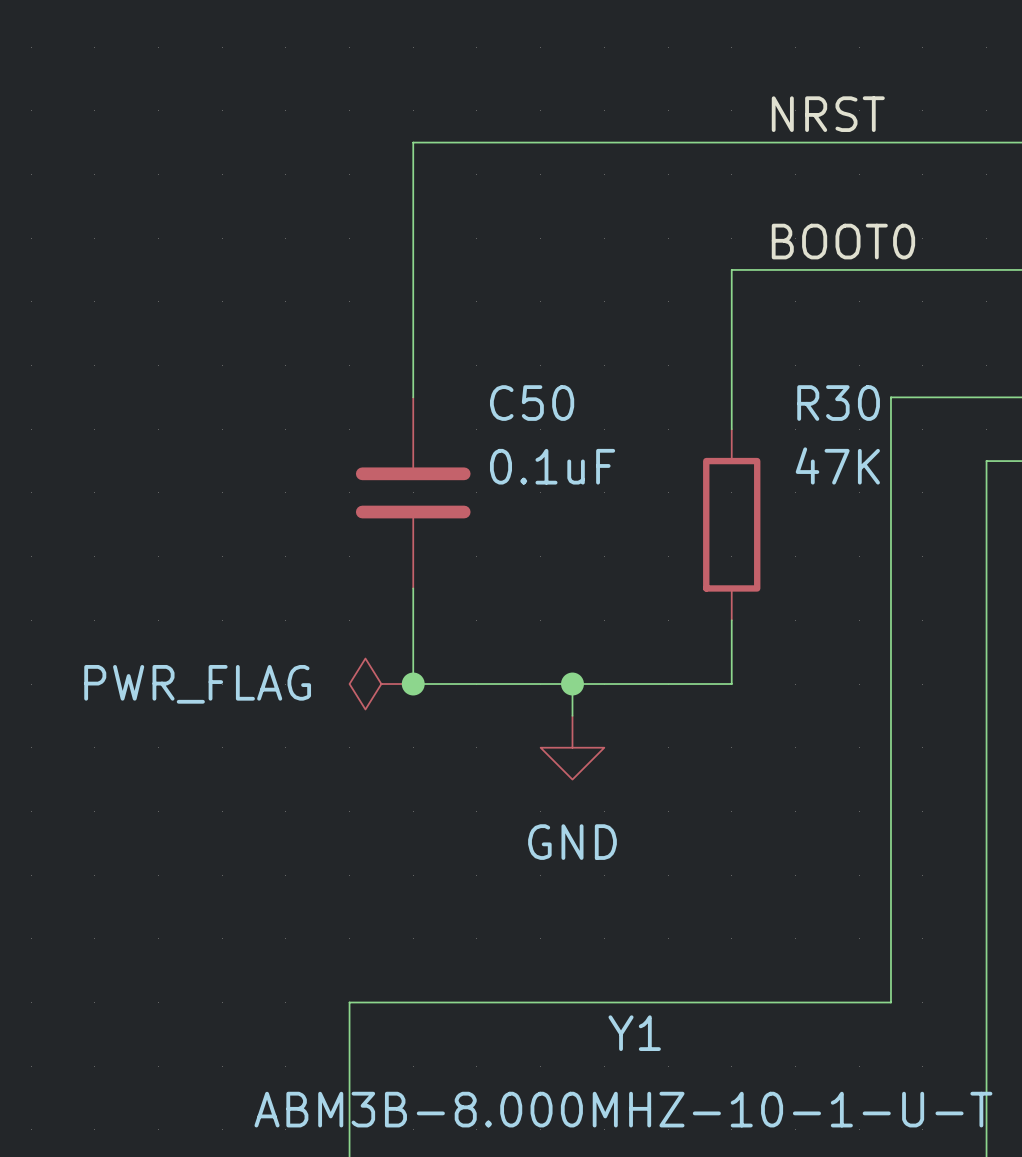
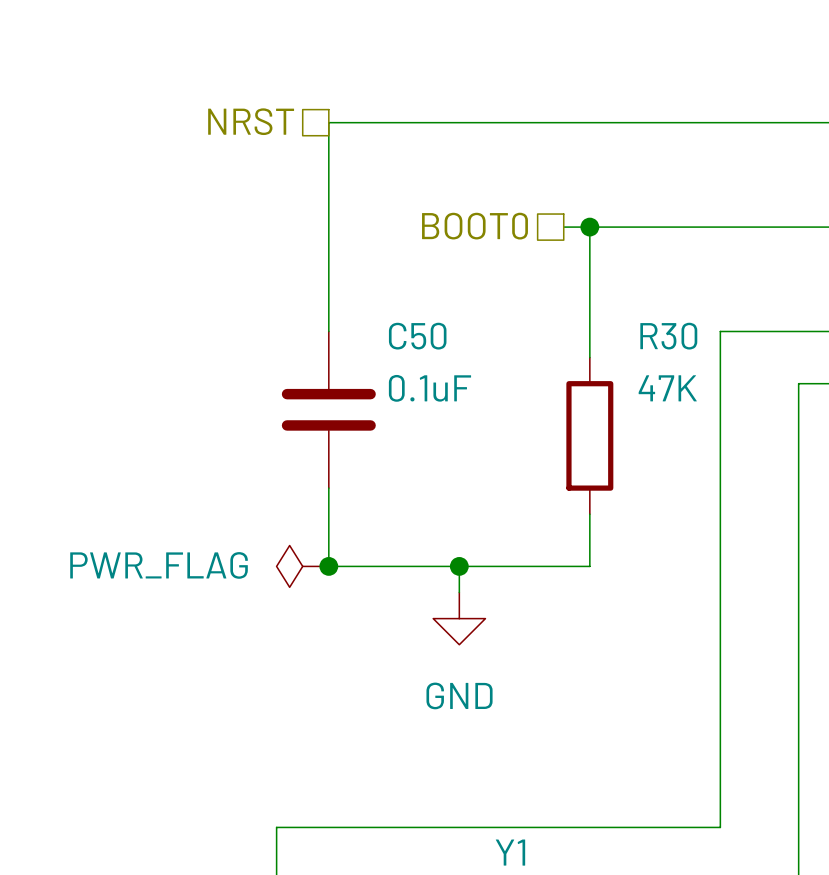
label: NRST (828, 114) -> none
hierarchical label: none -> NRST (251, 121)
label: BOOT0 (843, 241) -> none
hierarchical label: none -> BOOT0 (474, 226)
wire: none -> (563, 227) (589, 227)
junction: none -> (589, 227)

